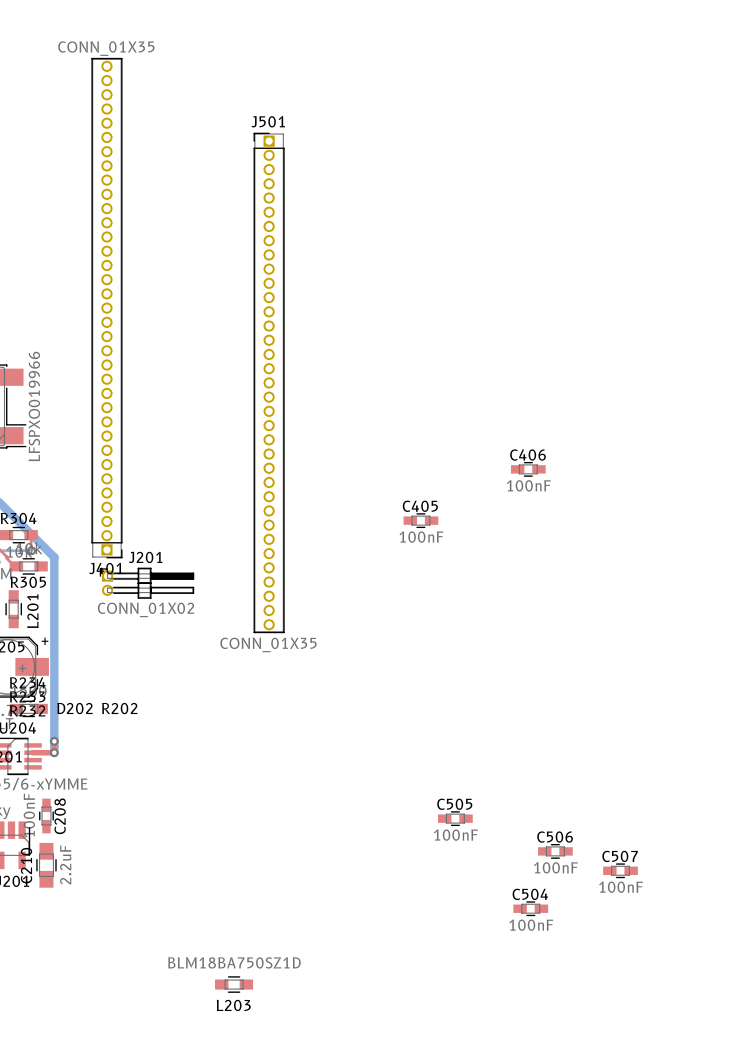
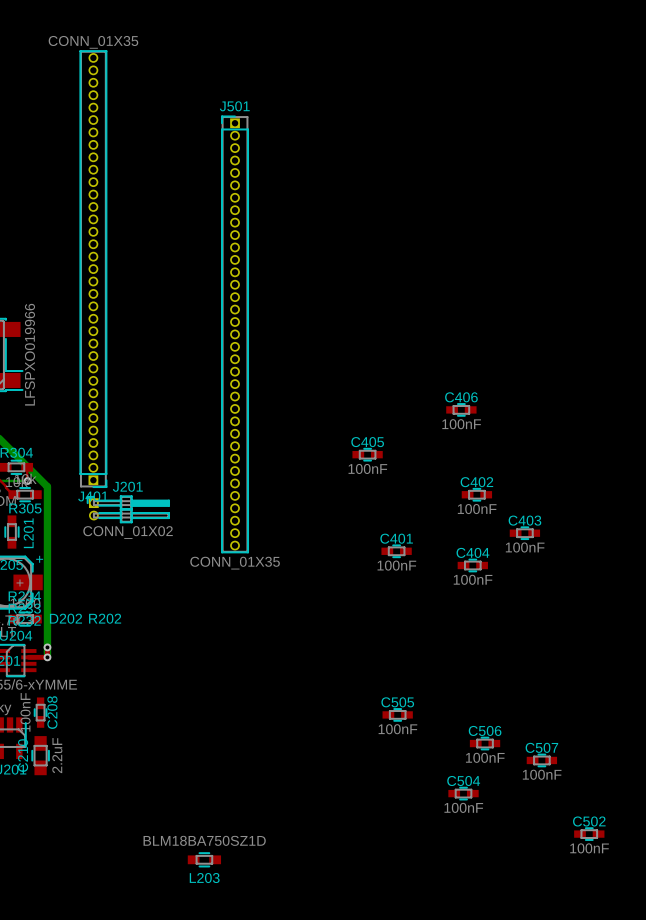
C402: none -> 100nF (476, 494)
C403: none -> 100nF (524, 533)
C401: none -> 100nF (396, 551)
C404: none -> 100nF (472, 565)
C502: none -> 100nF (589, 834)

